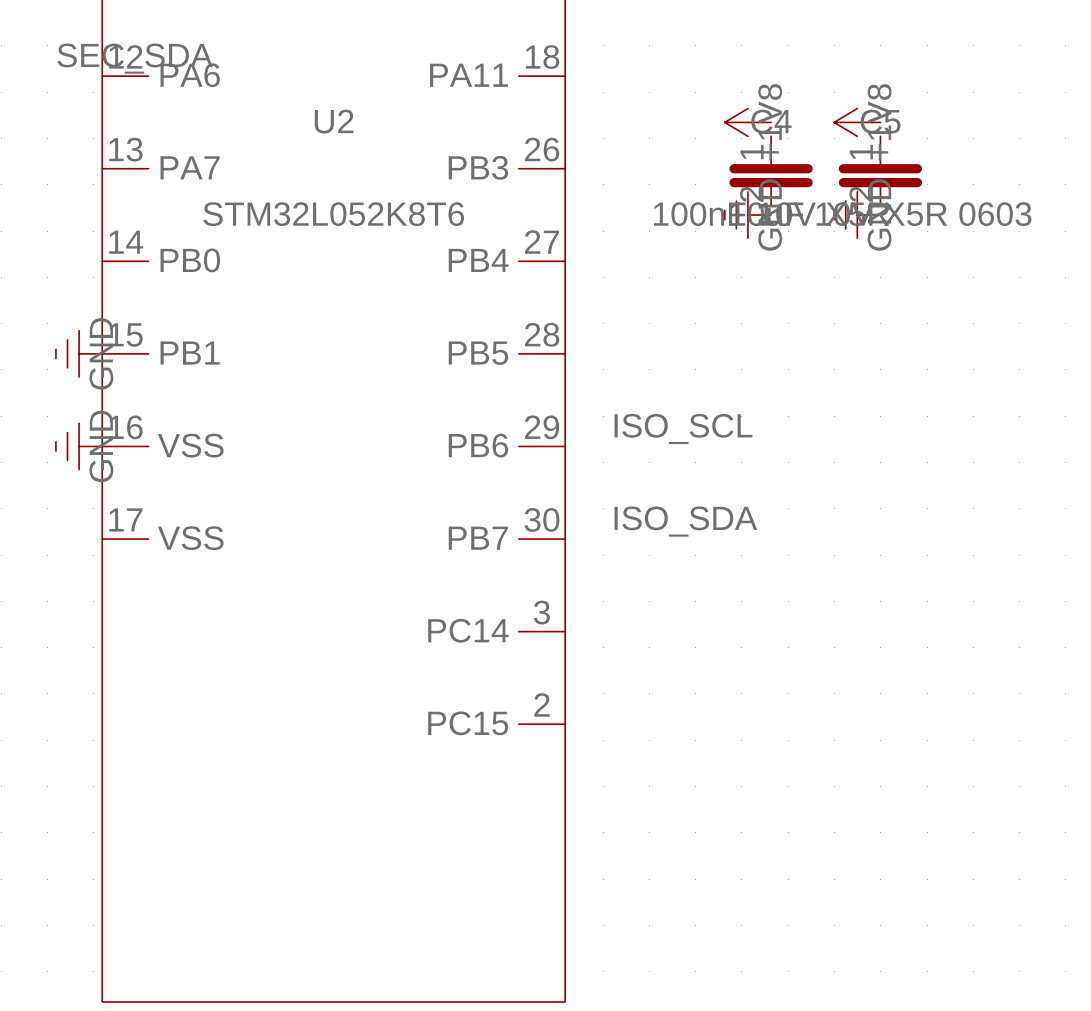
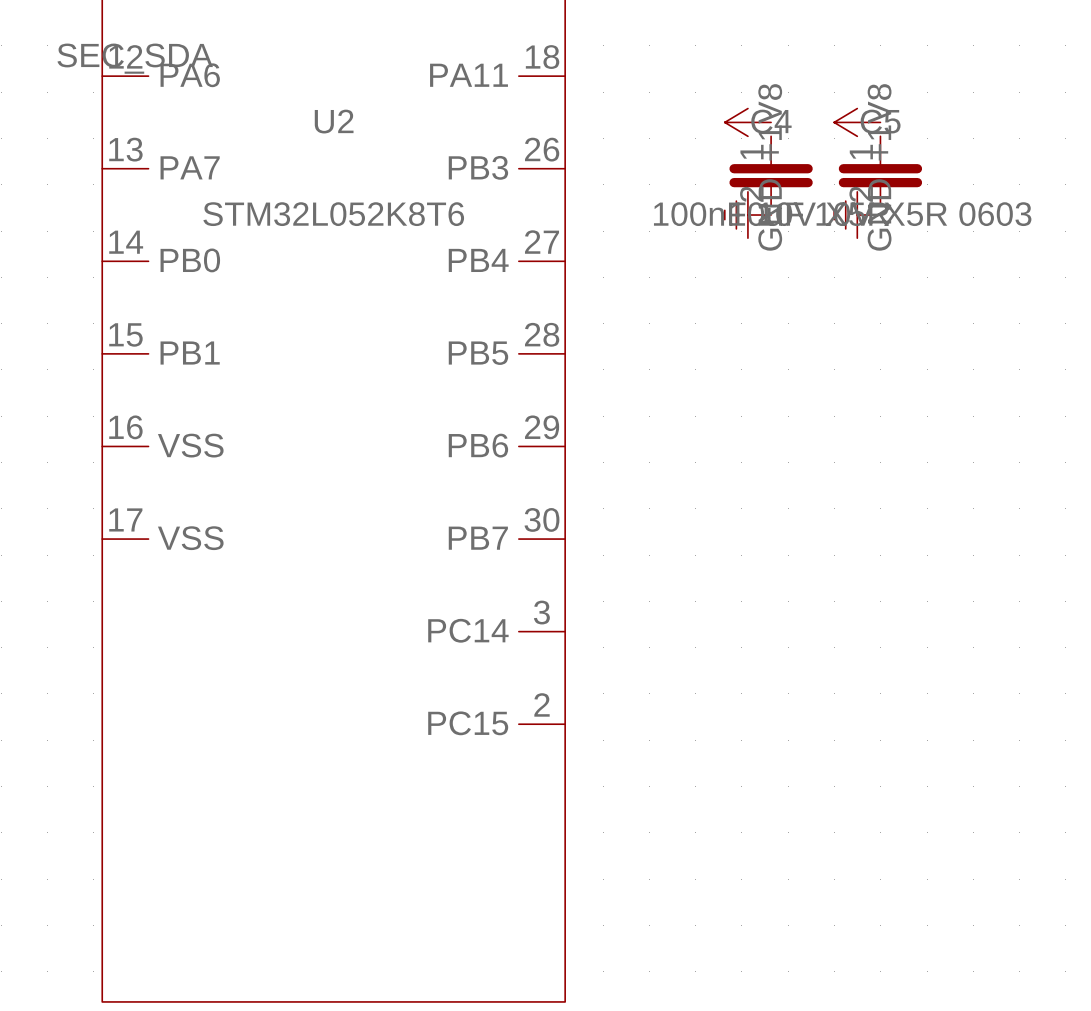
power symbol: GND (79, 353) -> none
label: ISO_SCL (683, 428) -> none
power symbol: GND (79, 446) -> none
label: ISO_SDA (685, 521) -> none

